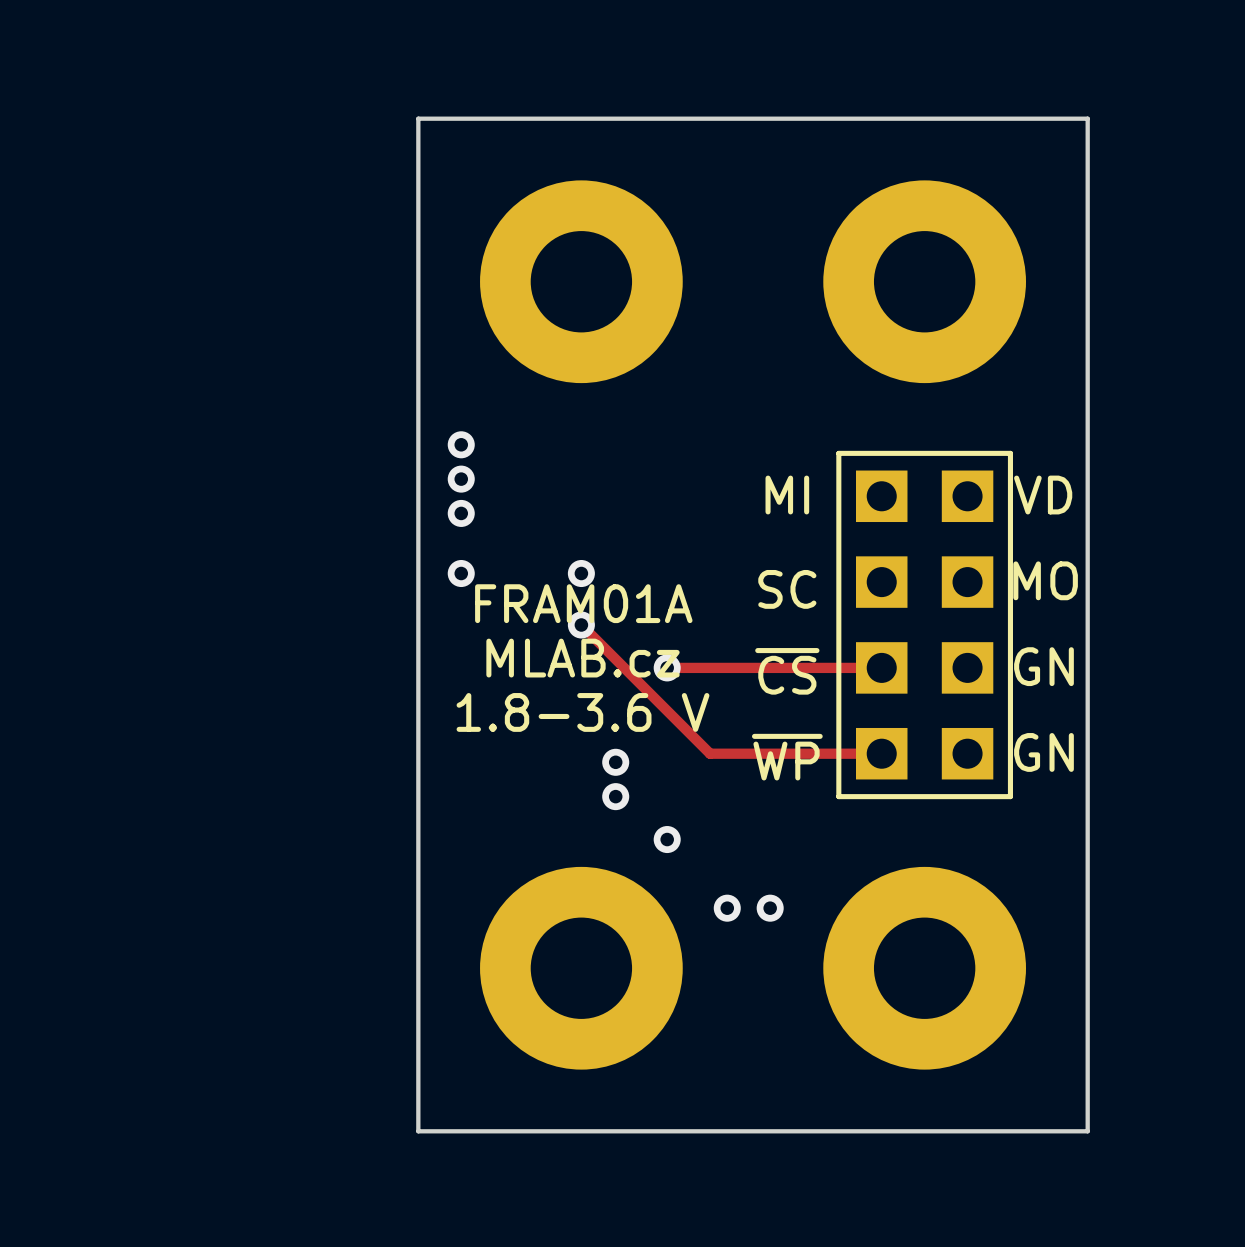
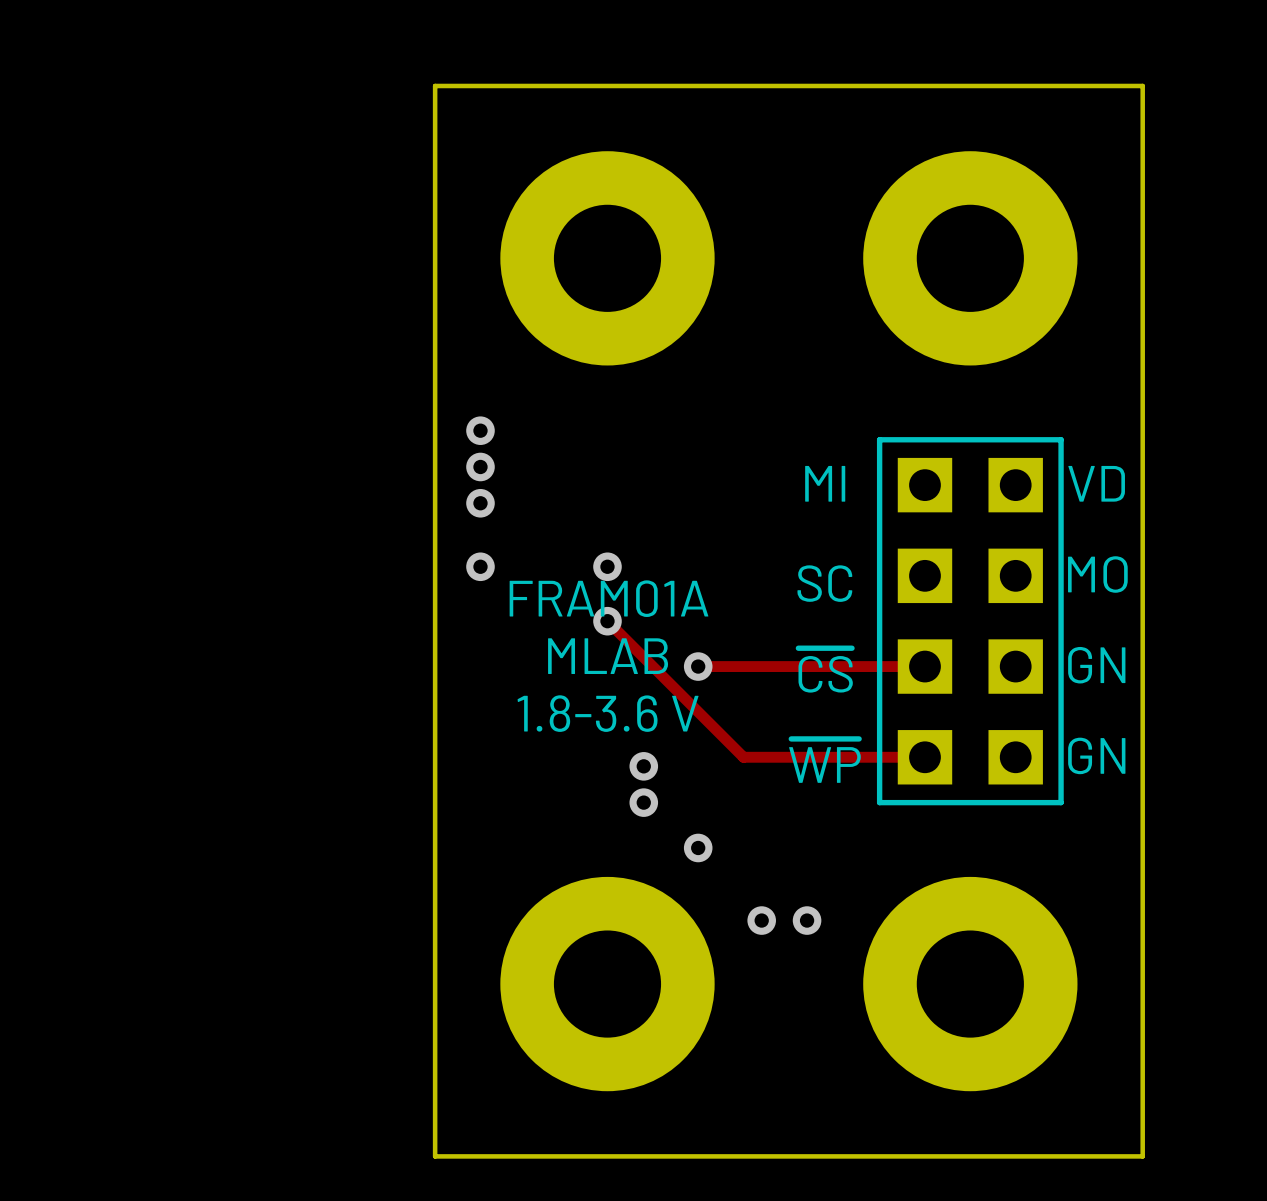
text: MLAB.cz (582, 658) -> MLAB (608, 656)

